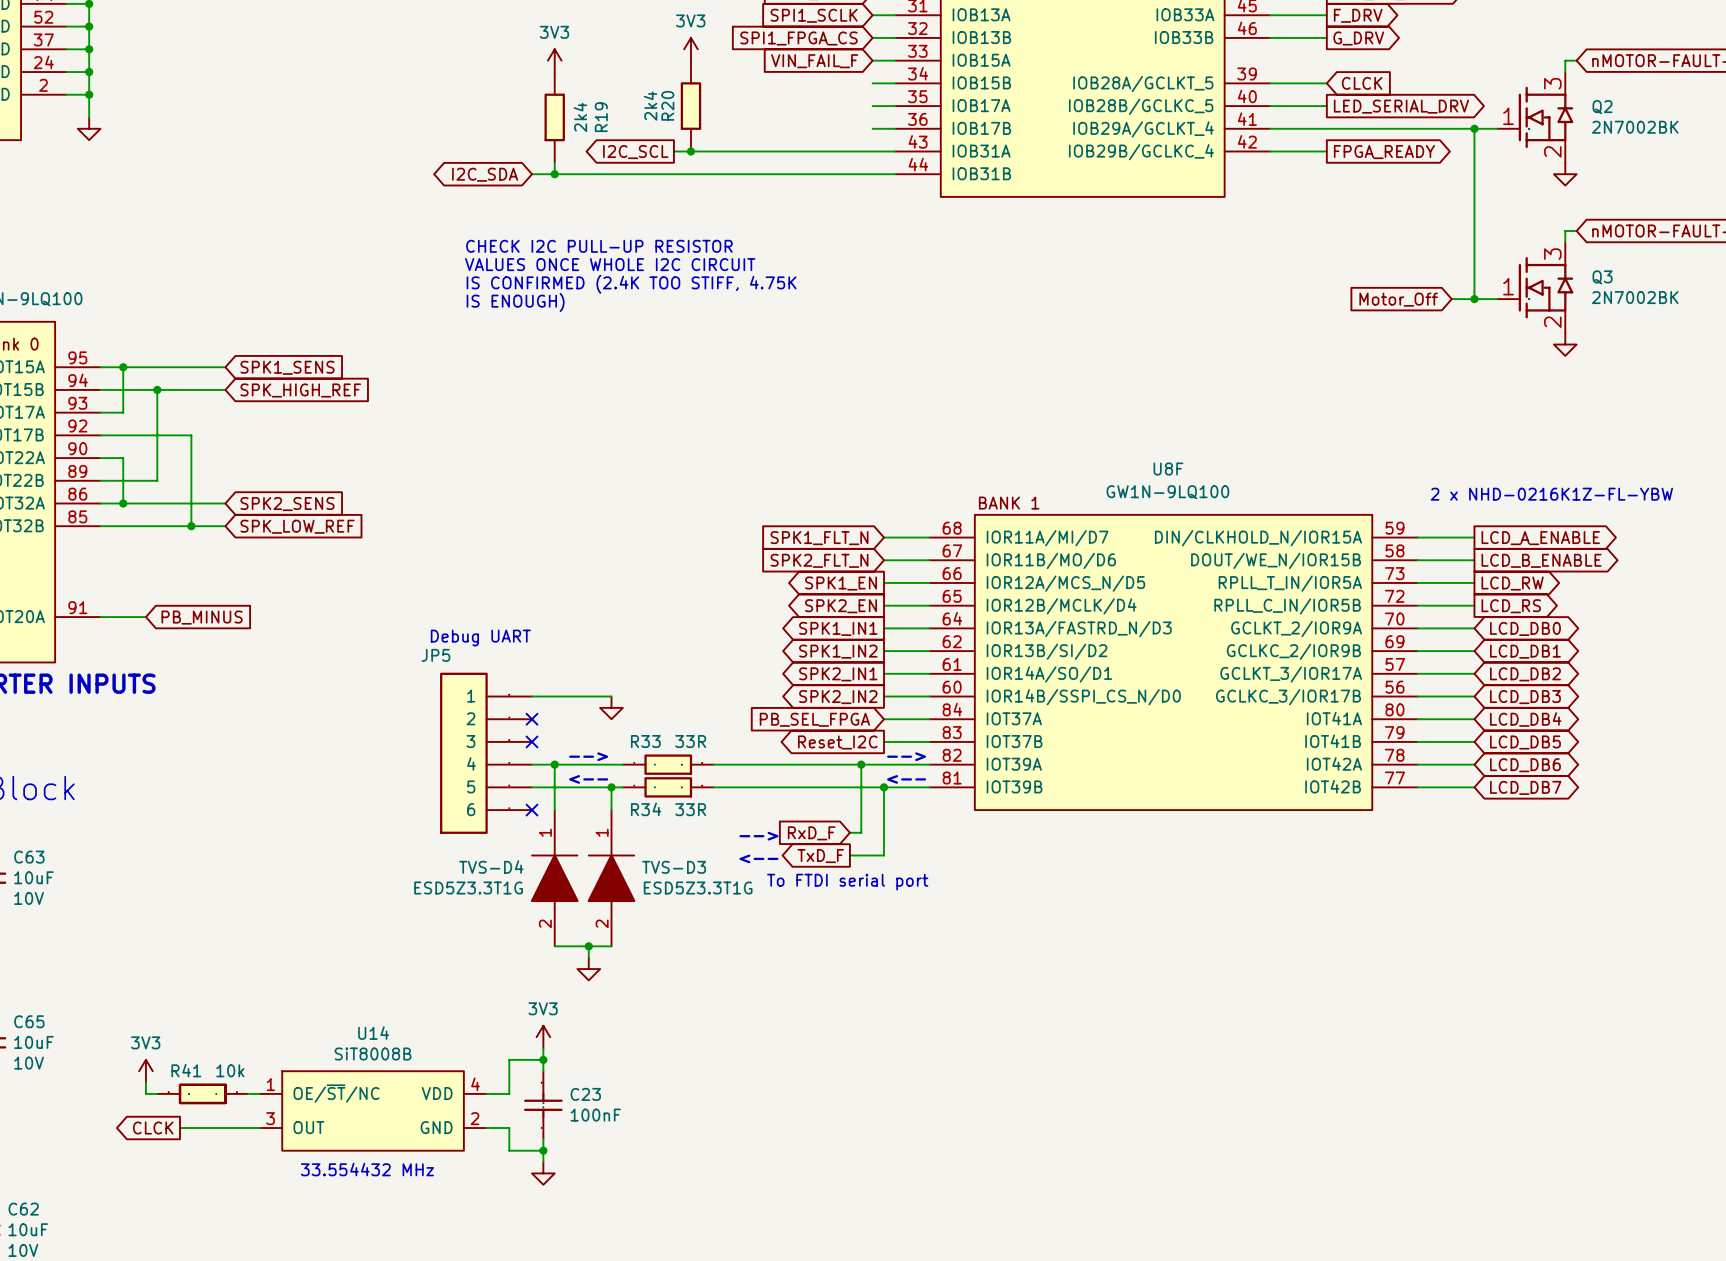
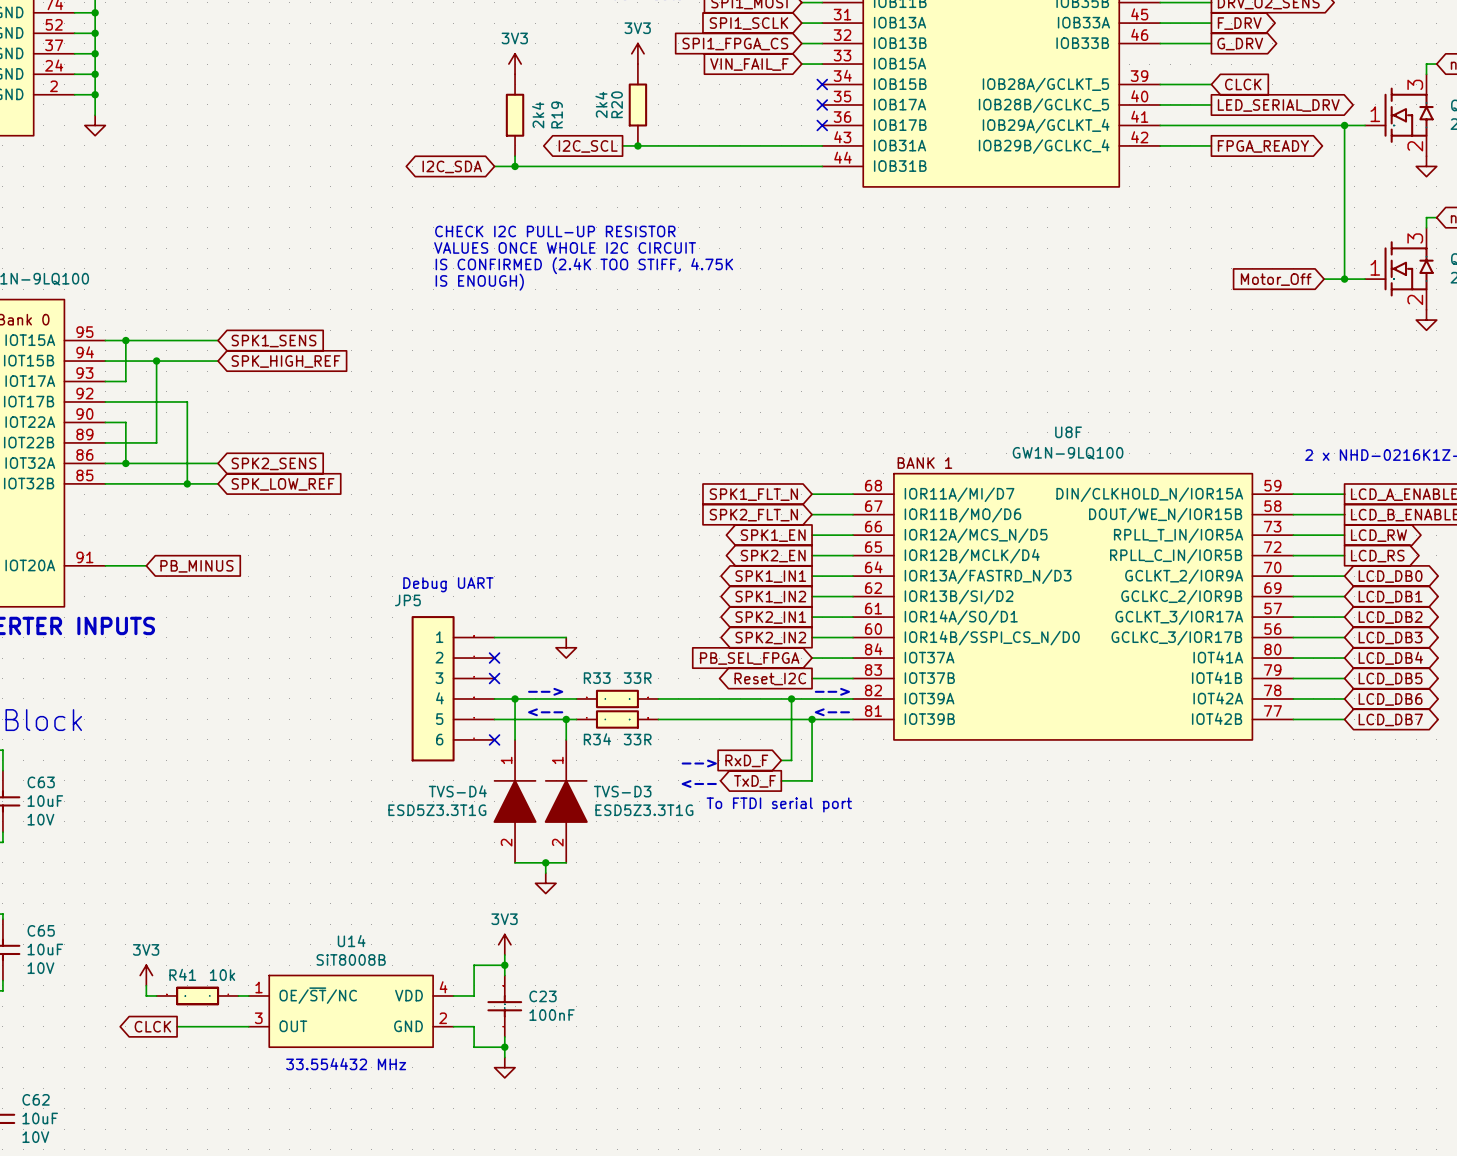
wire: (872, 83) (895, 83) -> none
no-connect mark: none -> (822, 84)
wire: (872, 106) (895, 106) -> none
no-connect mark: none -> (822, 104)
wire: (872, 128) (895, 128) -> none
no-connect mark: none -> (822, 125)

